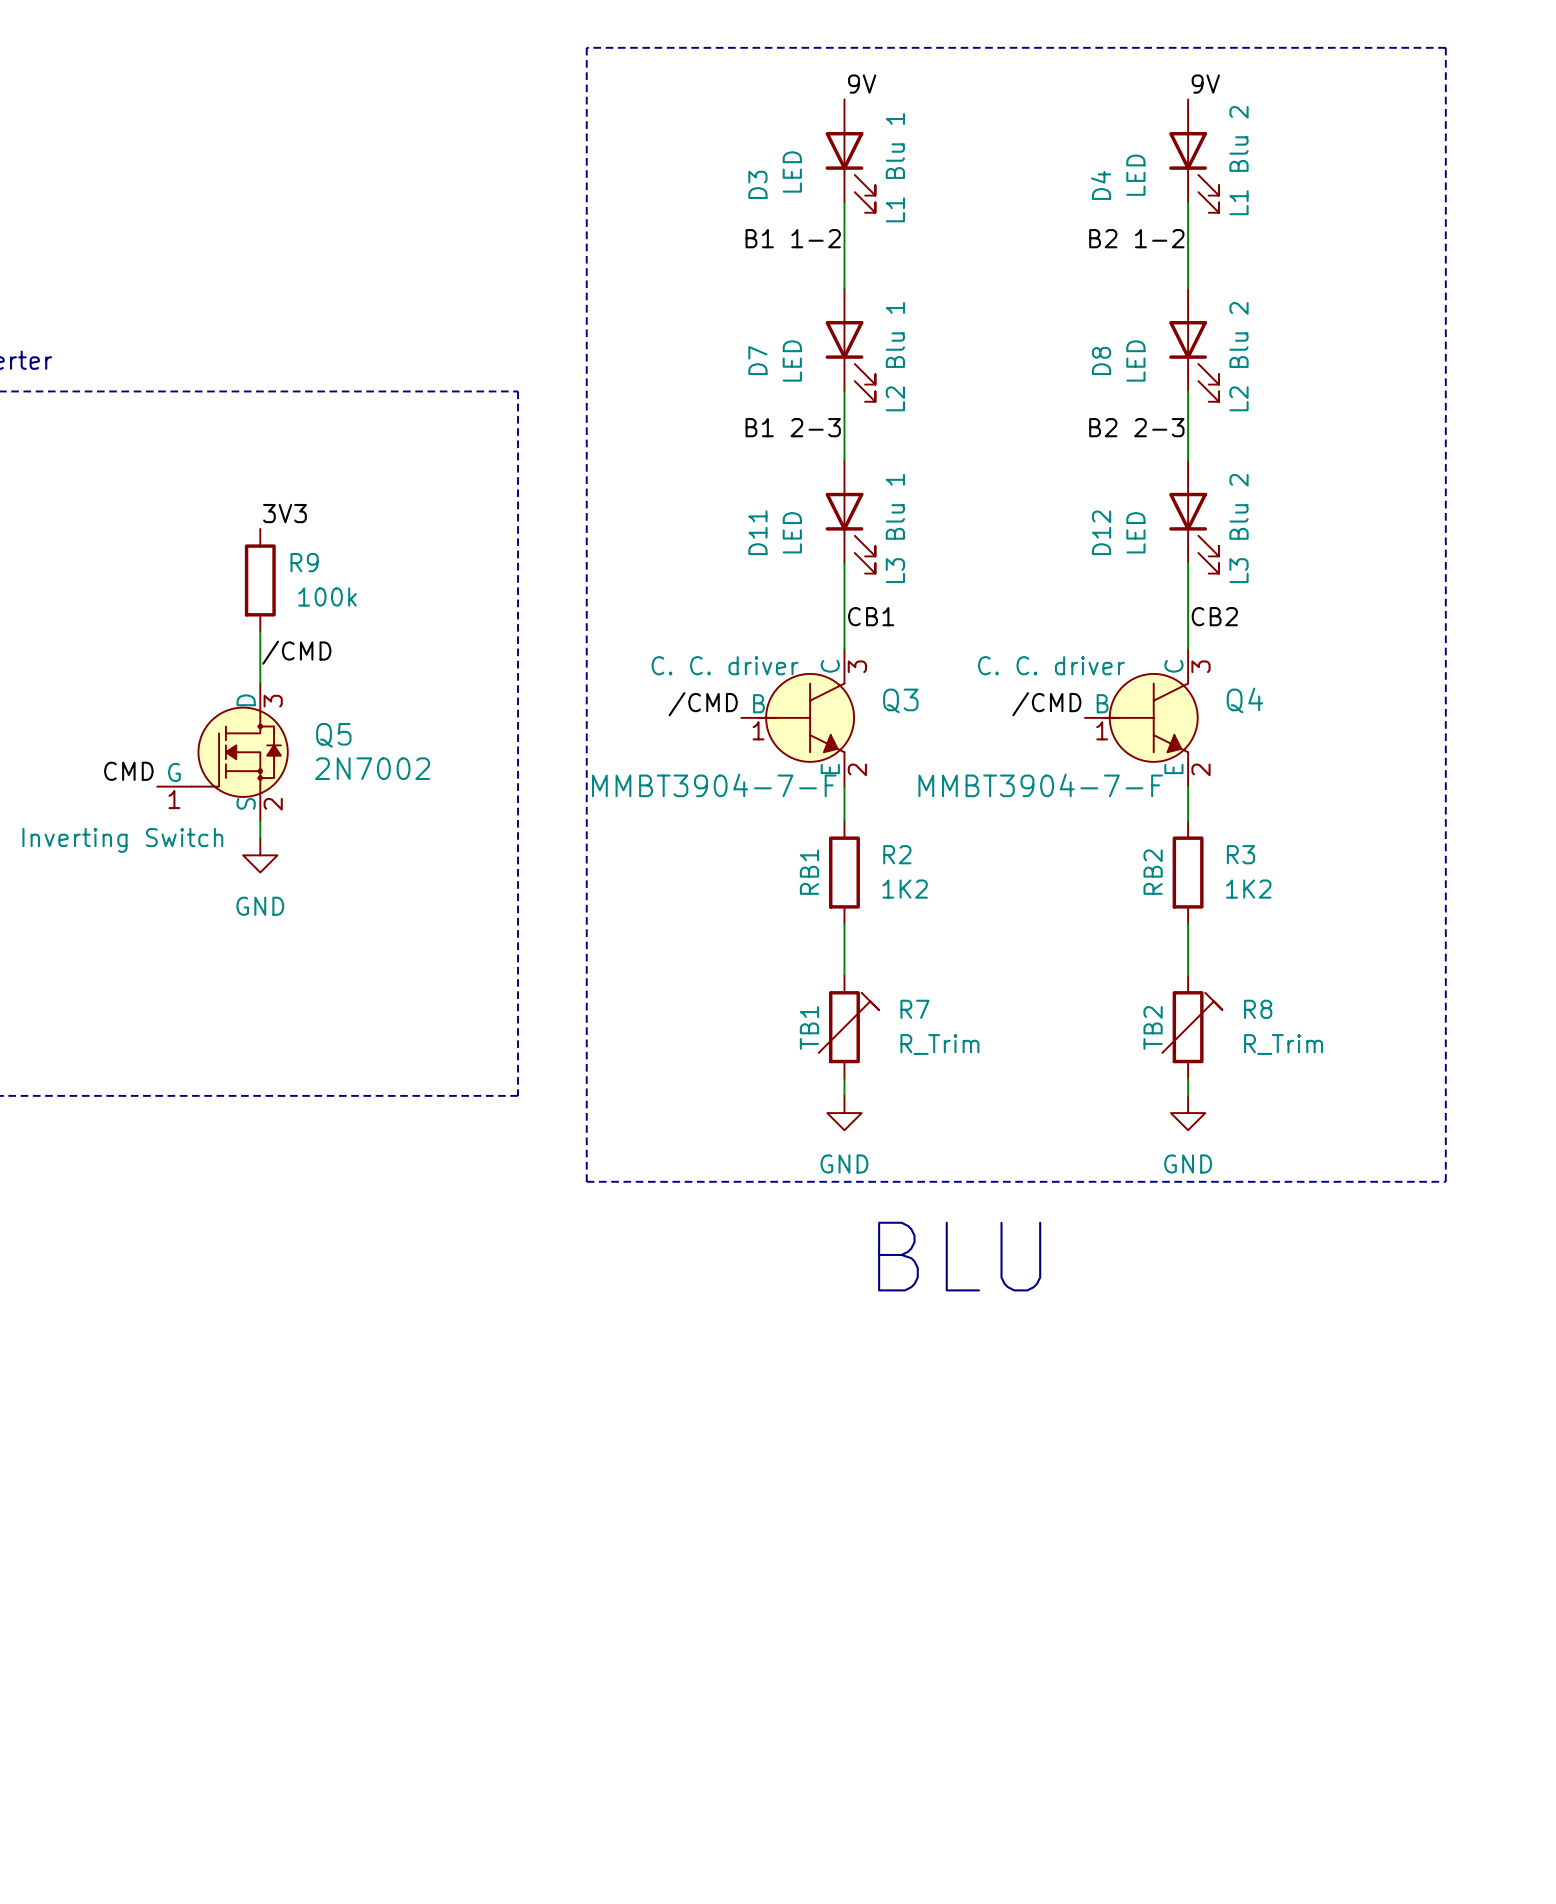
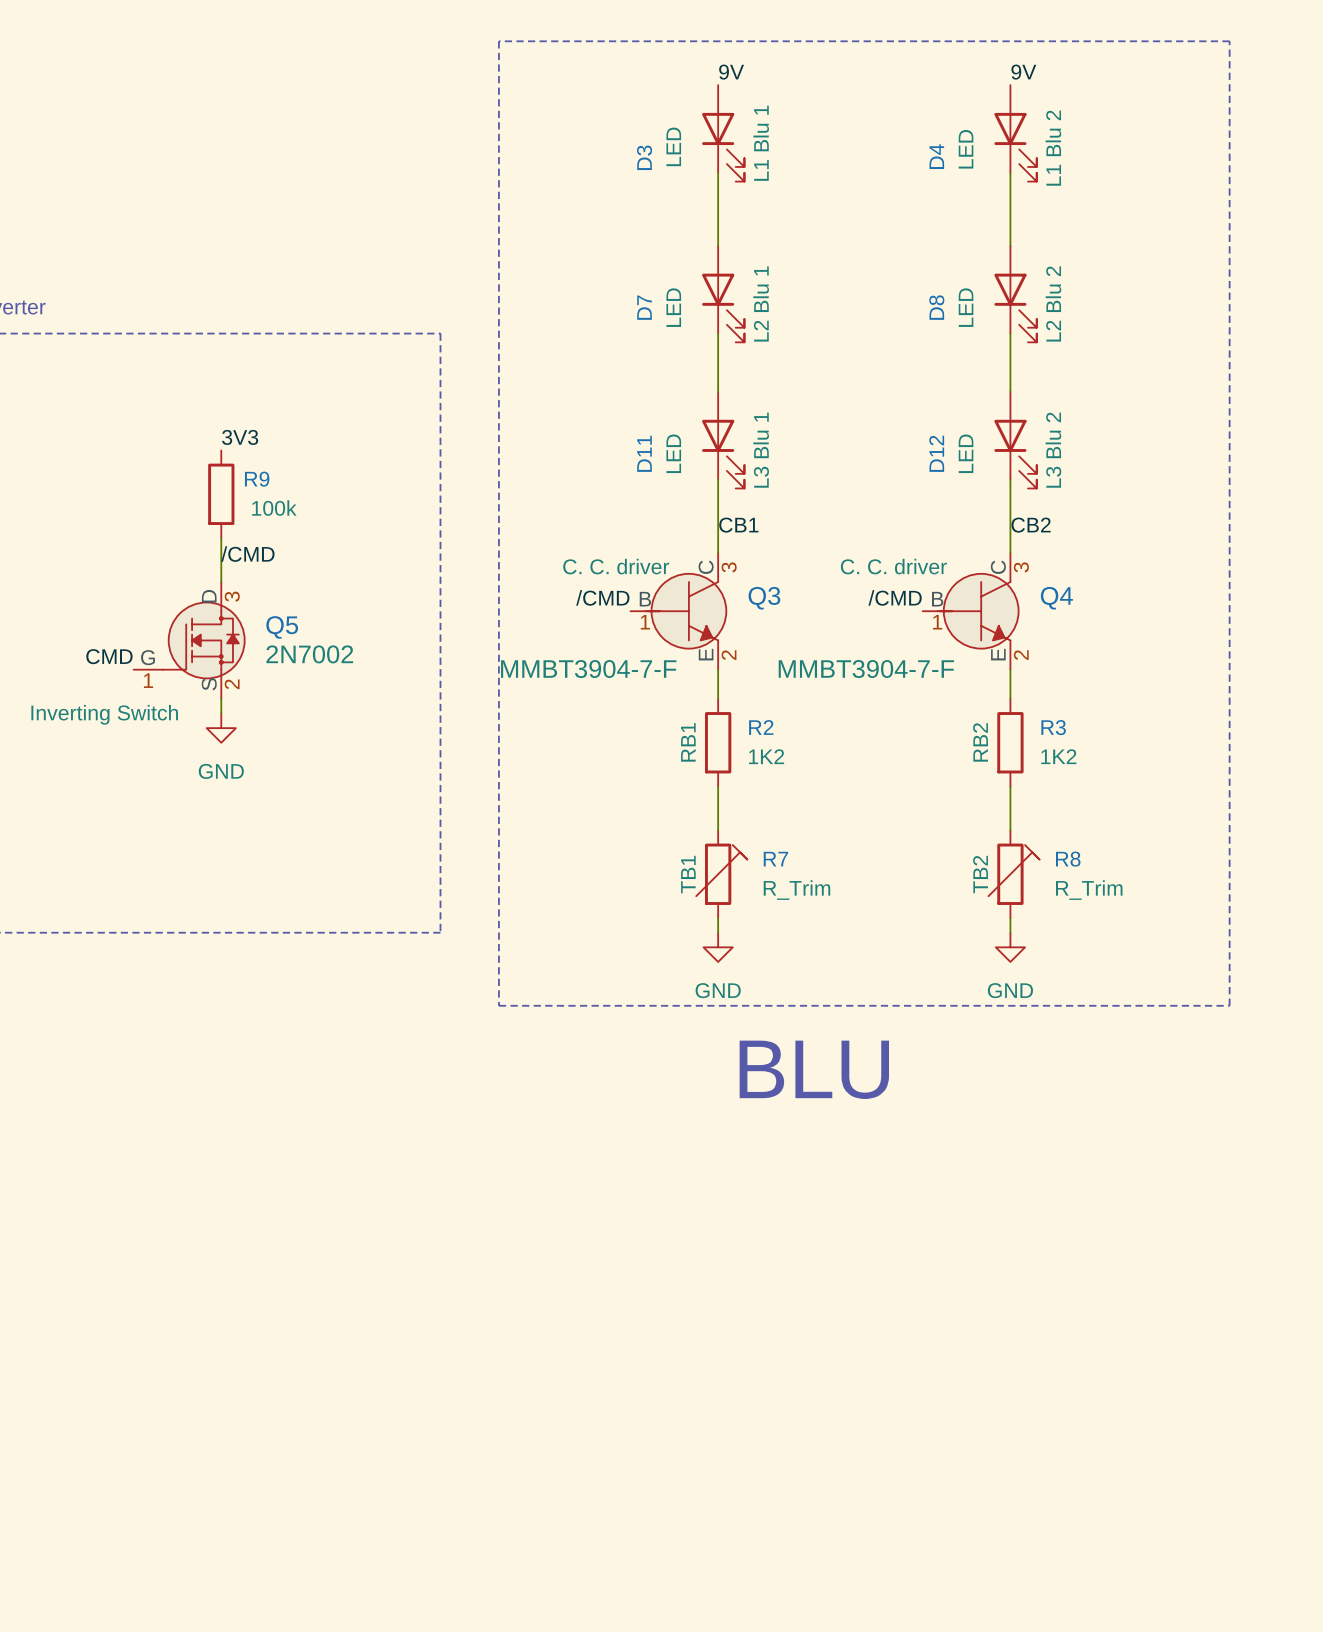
label: B1 1-2 (793, 238) -> none
label: B2 1-2 (1136, 238) -> none
label: B1 2-3 (793, 427) -> none
label: B2 2-3 (1136, 427) -> none

